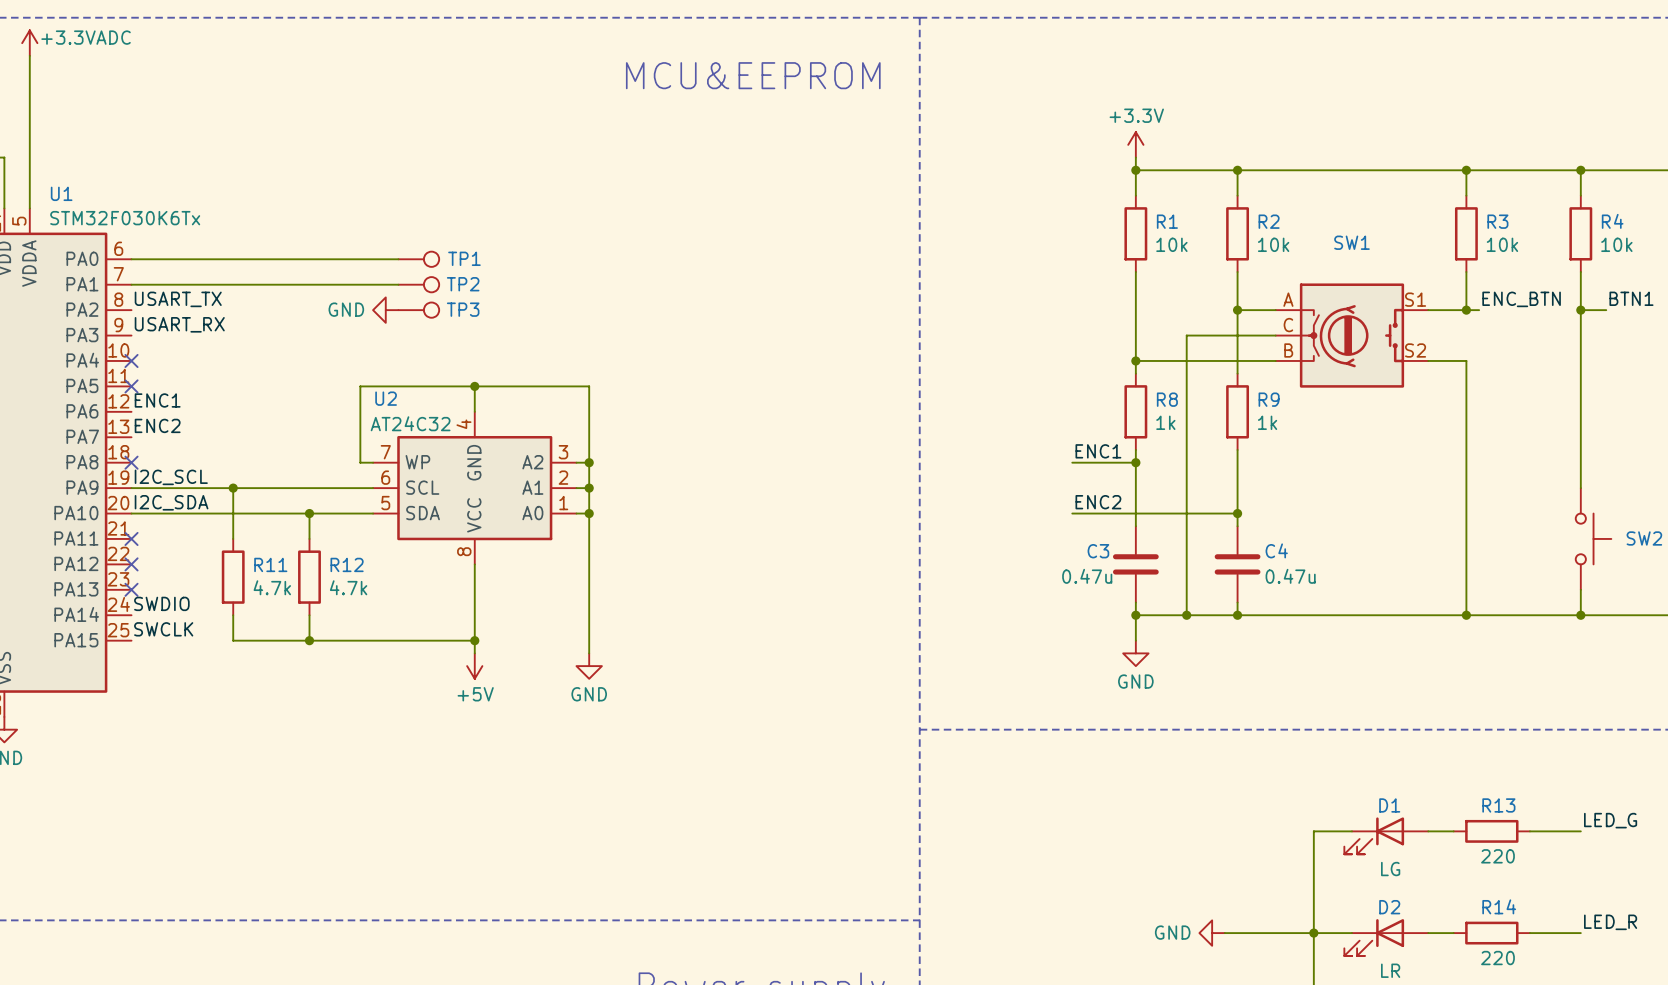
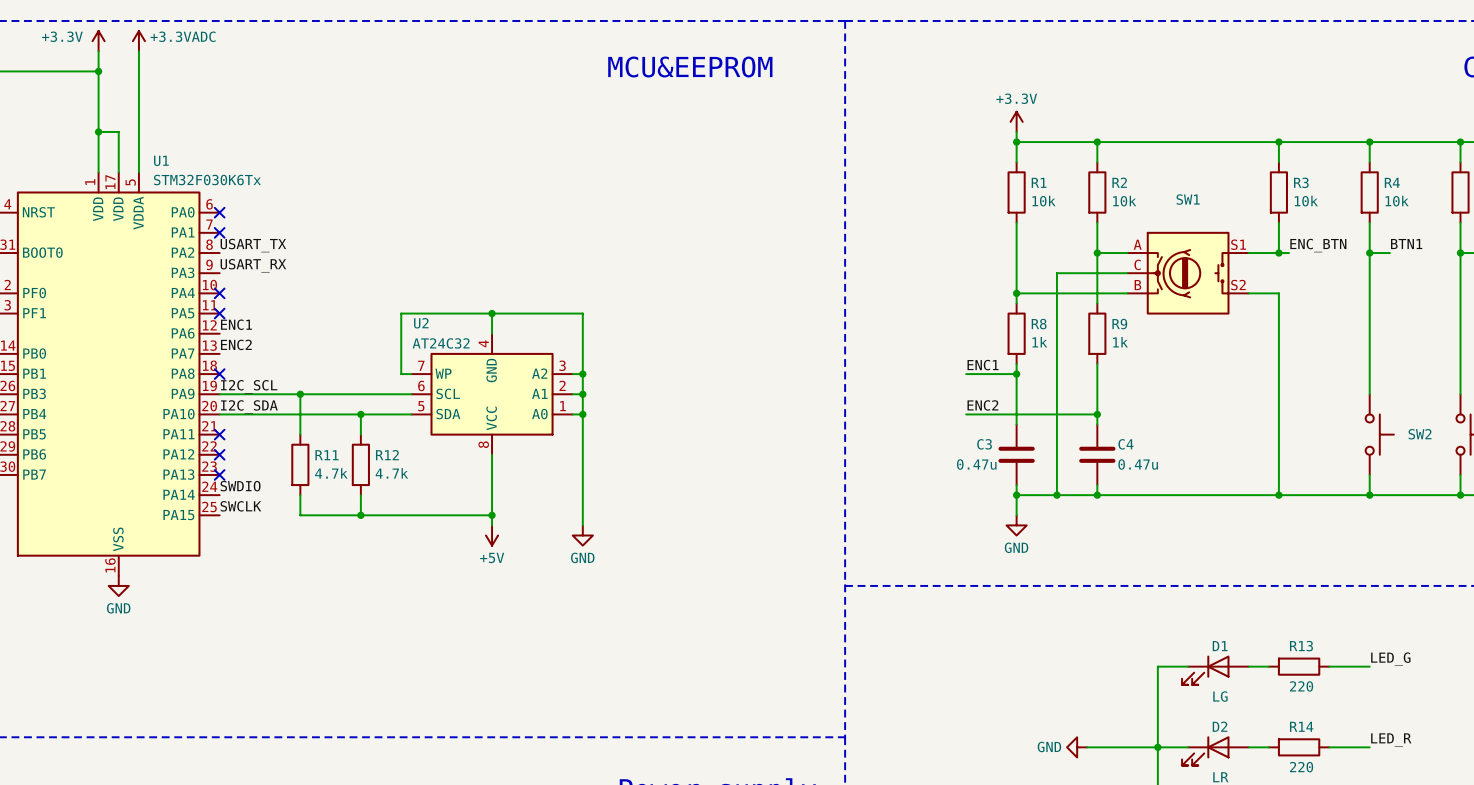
wire: (131, 259) (398, 259) -> none
no-connect mark: none -> (219, 212)
TP1: (418, 259) -> none
wire: (131, 284) (398, 284) -> none
no-connect mark: none -> (219, 232)
TP2: (418, 284) -> none
power symbol: GND (385, 310) -> none
TP3: (418, 310) -> none

